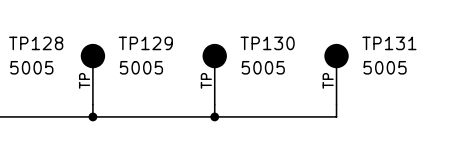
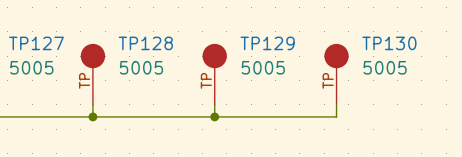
TP128 name: TP128 (36, 43) -> TP127 (36, 43)
TP129 name: TP129 (145, 43) -> TP128 (145, 43)
TP130 name: TP130 (267, 43) -> TP129 (267, 43)
TP131 name: TP131 (389, 43) -> TP130 (389, 43)

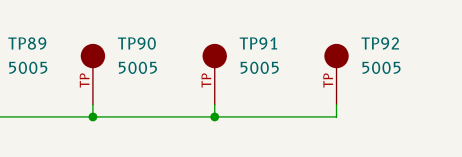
TP127 name: TP127 (36, 43) -> TP89 (27, 43)
TP128 name: TP128 (145, 43) -> TP90 (136, 43)
TP129 name: TP129 (267, 43) -> TP91 (258, 43)
TP130 name: TP130 (389, 43) -> TP92 (380, 43)

